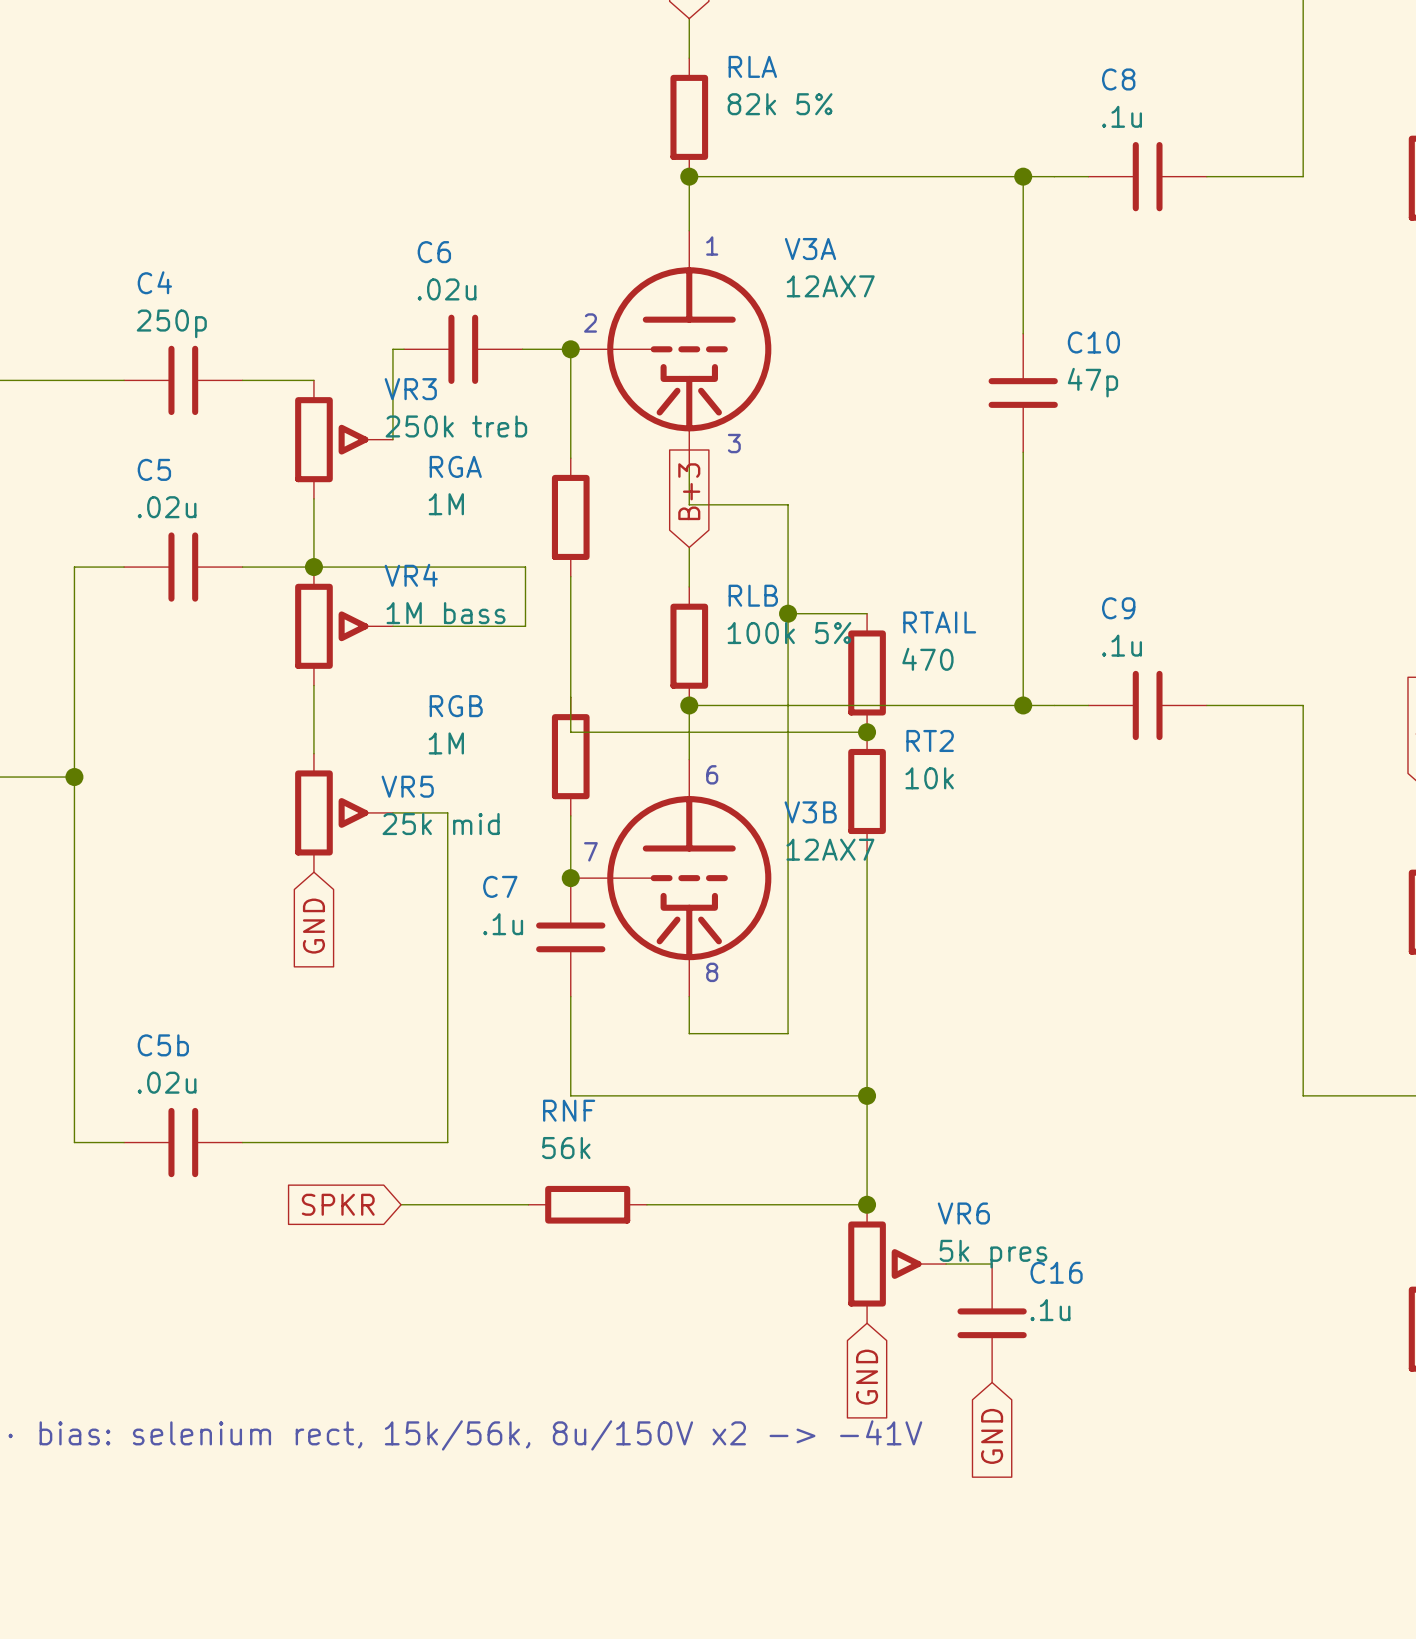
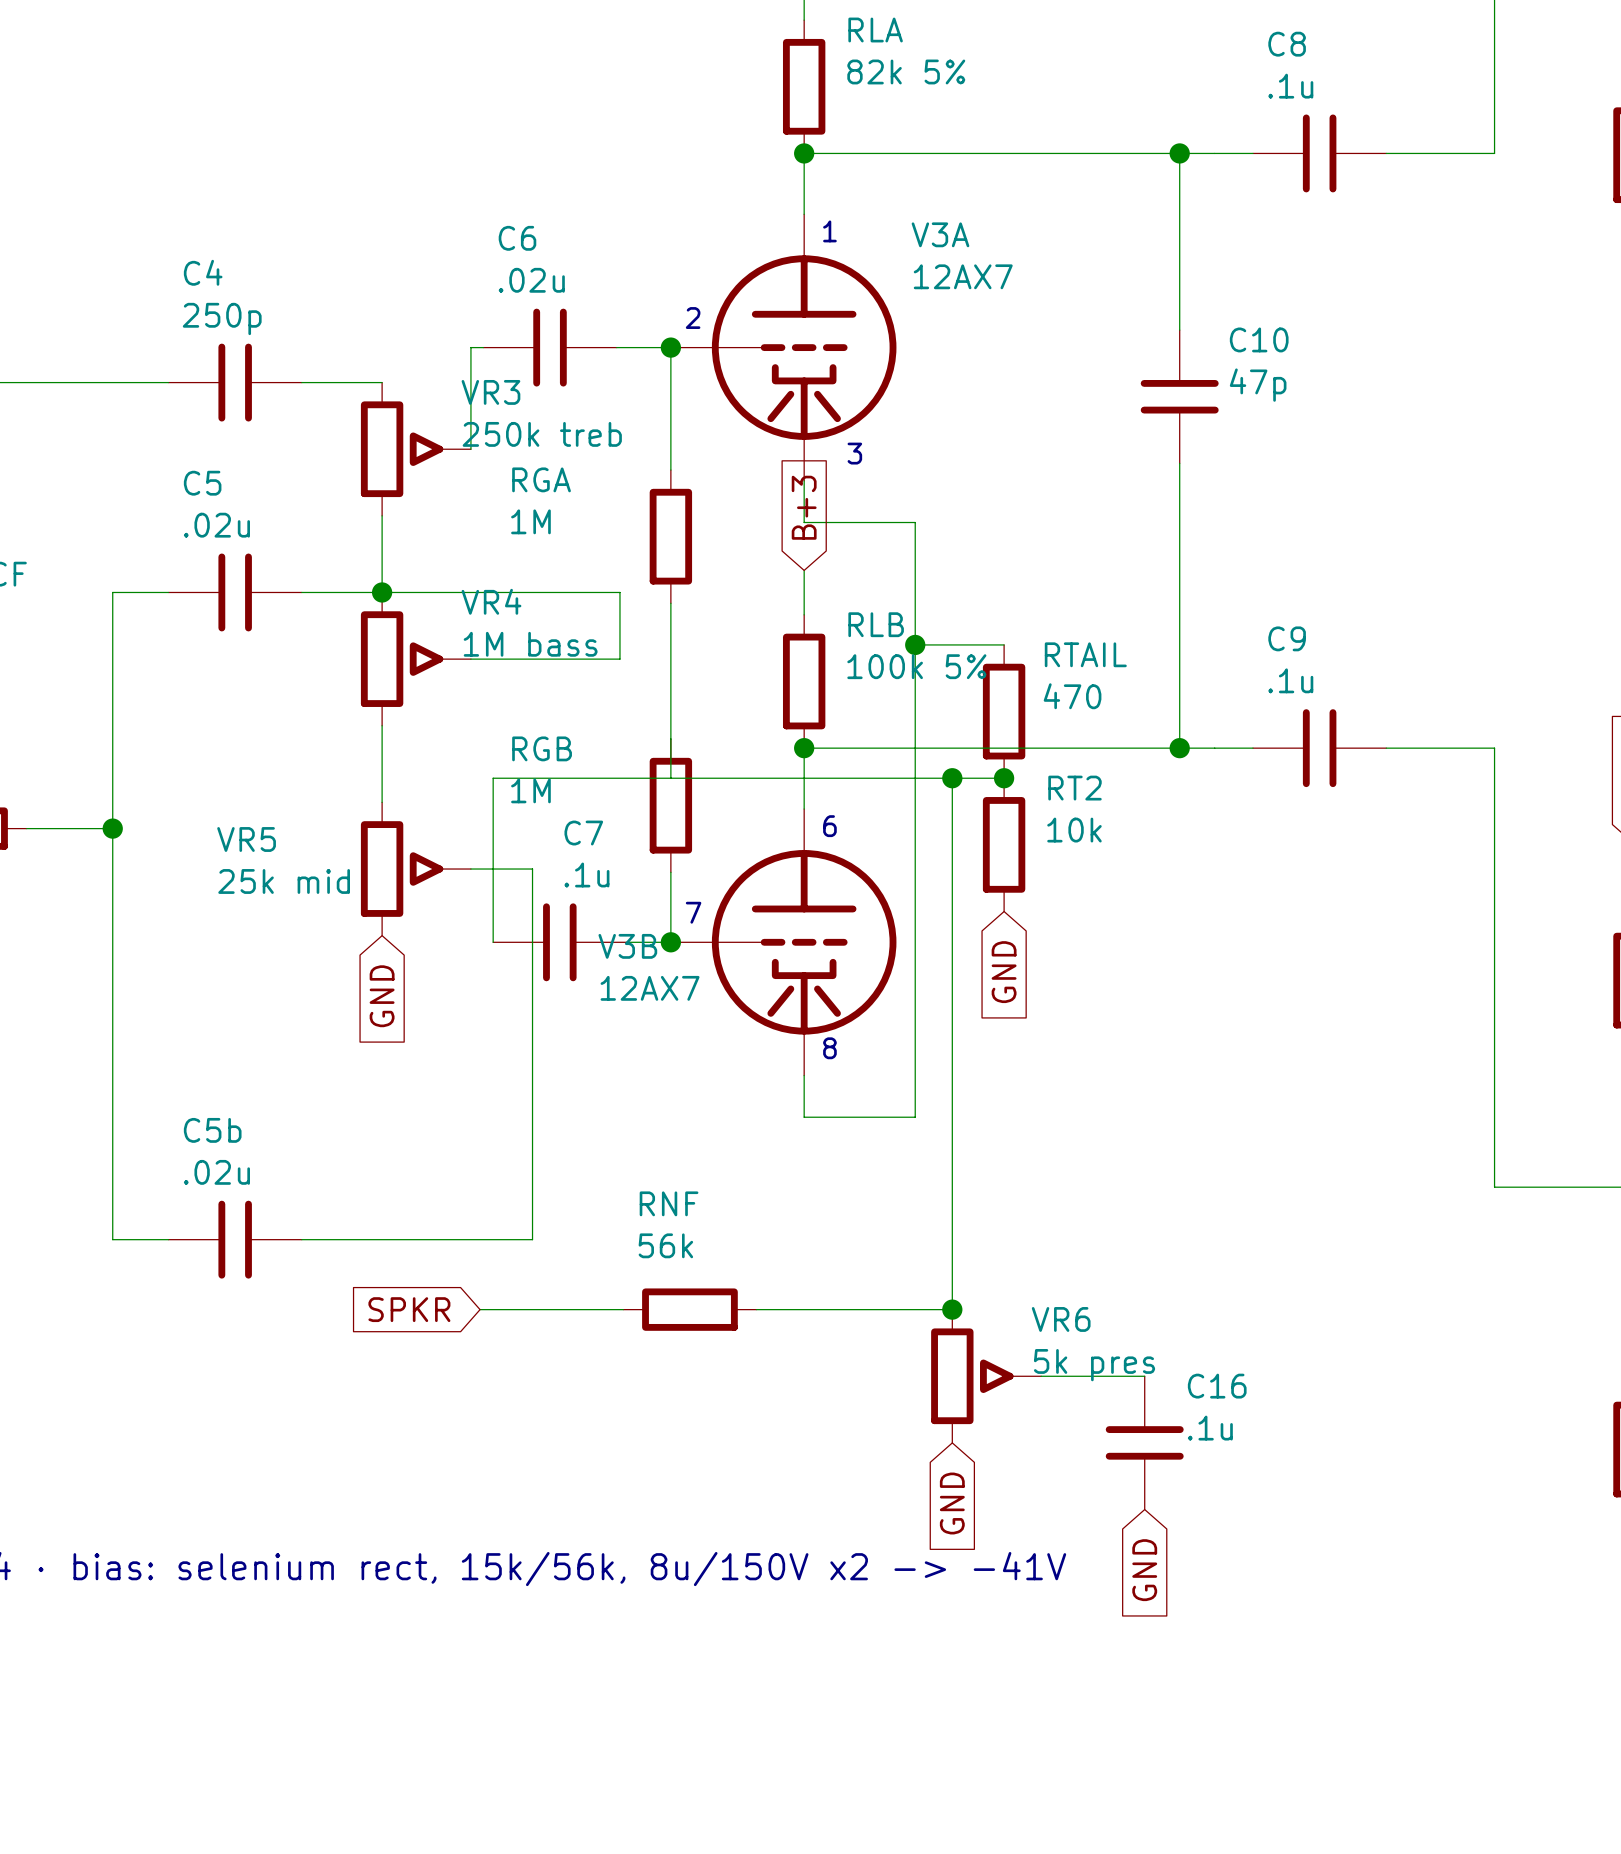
wire: none -> (670, 778) (493, 778) (493, 942)
junction: none -> (952, 778)
VR5 name position: VR5 (407, 786) -> VR5 (246, 839)
V3B name position: V3B (810, 812) -> V3B (627, 946)
VR5 value position: 25k mid (441, 824) -> 25k mid (284, 881)
V3B value position: 12AX7 (830, 849) -> 12AX7 (650, 988)
wire: (867, 850) (867, 1204) (821, 1204) -> (952, 778) (952, 1309)
wire: none -> (626, 942) (670, 942)
C7 name position: C7 (500, 886) -> C7 (583, 833)
global label: none -> GND (1004, 972)
C7 rotation: 0° (570, 937) -> 90° clockwise (559, 942)
C7 position: (570, 937) -> (559, 942)
wire: (570, 996) (570, 1095) (867, 1095) -> none
junction: (867, 1095) -> none
junction position: (867, 1204) -> (952, 1309)
VR6 position: (897, 1264) -> (986, 1376)
global label position: GND (867, 1377) -> GND (952, 1503)

